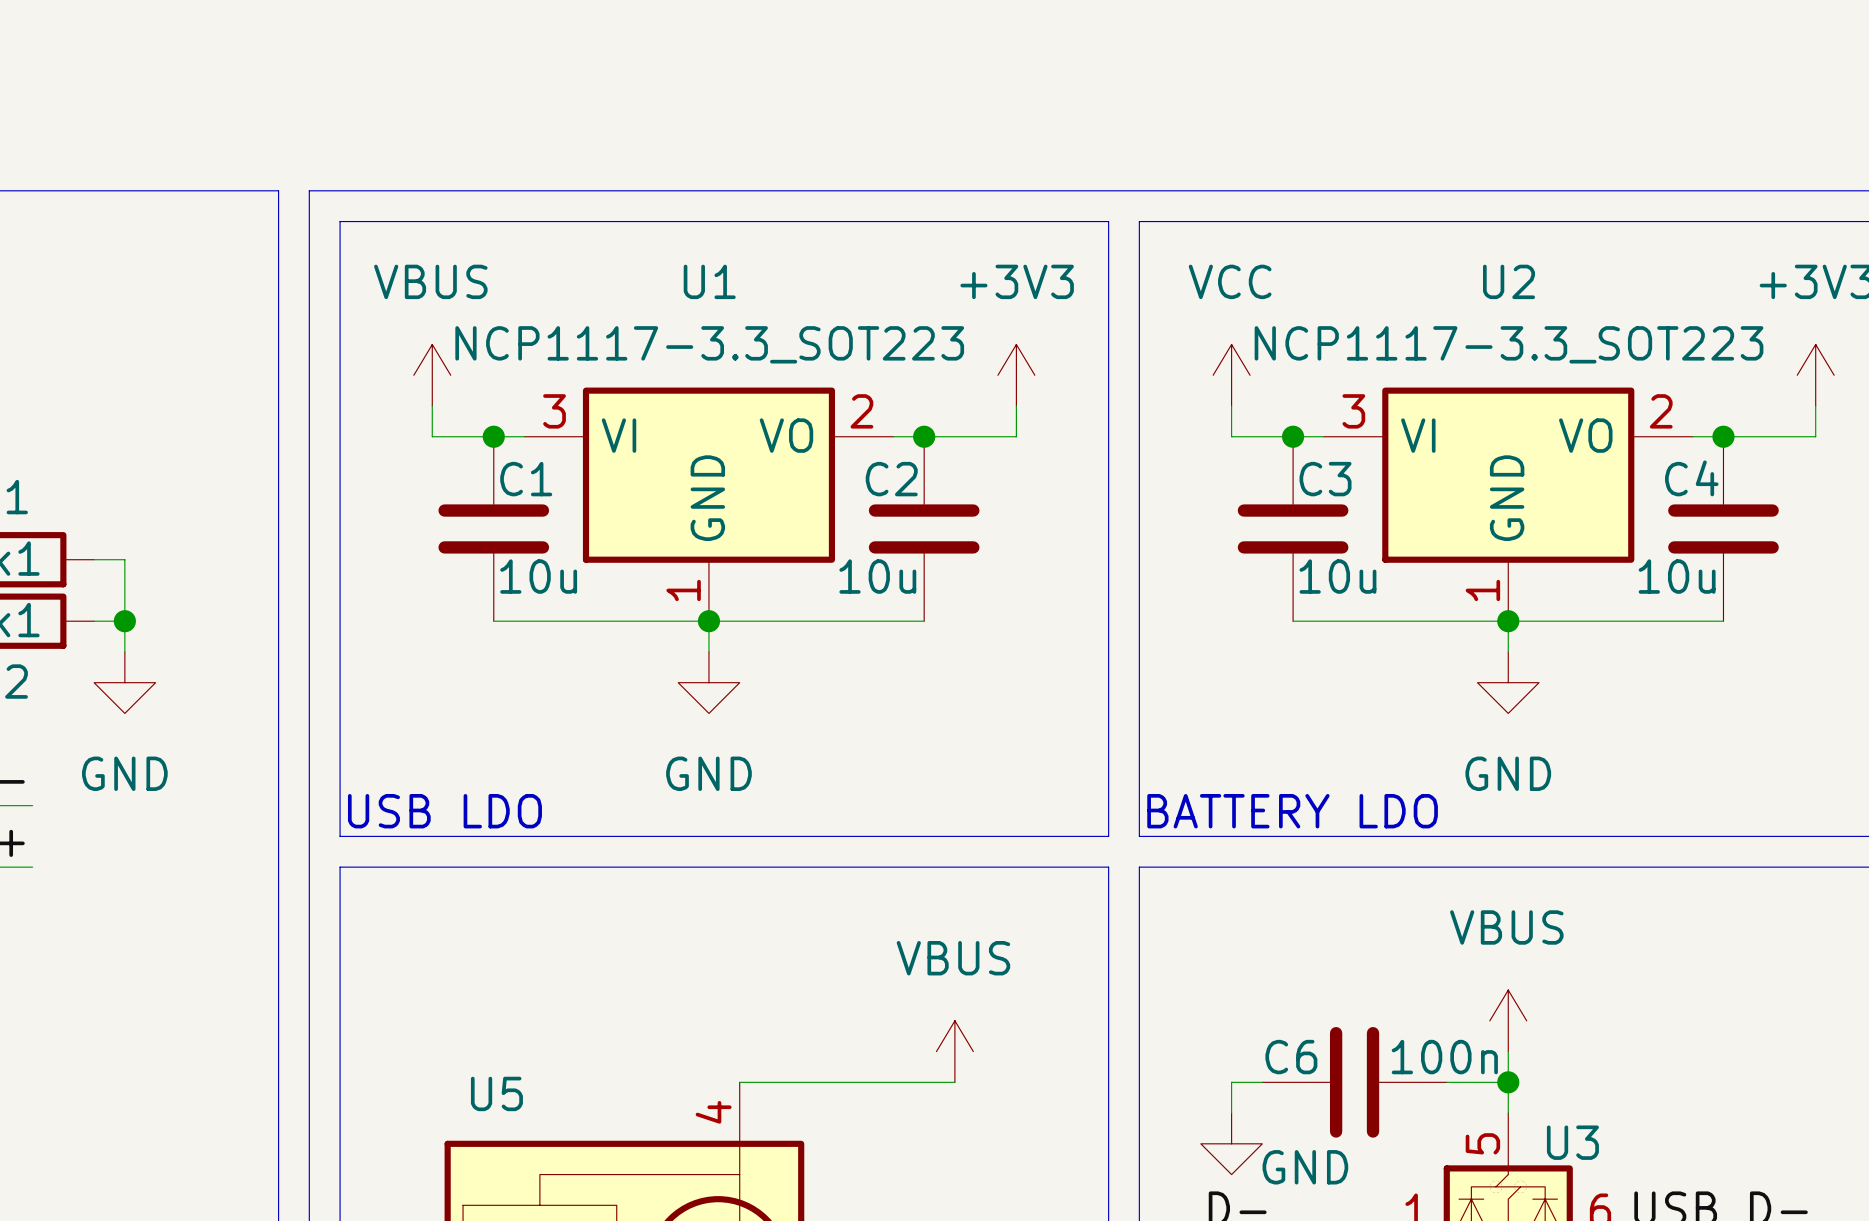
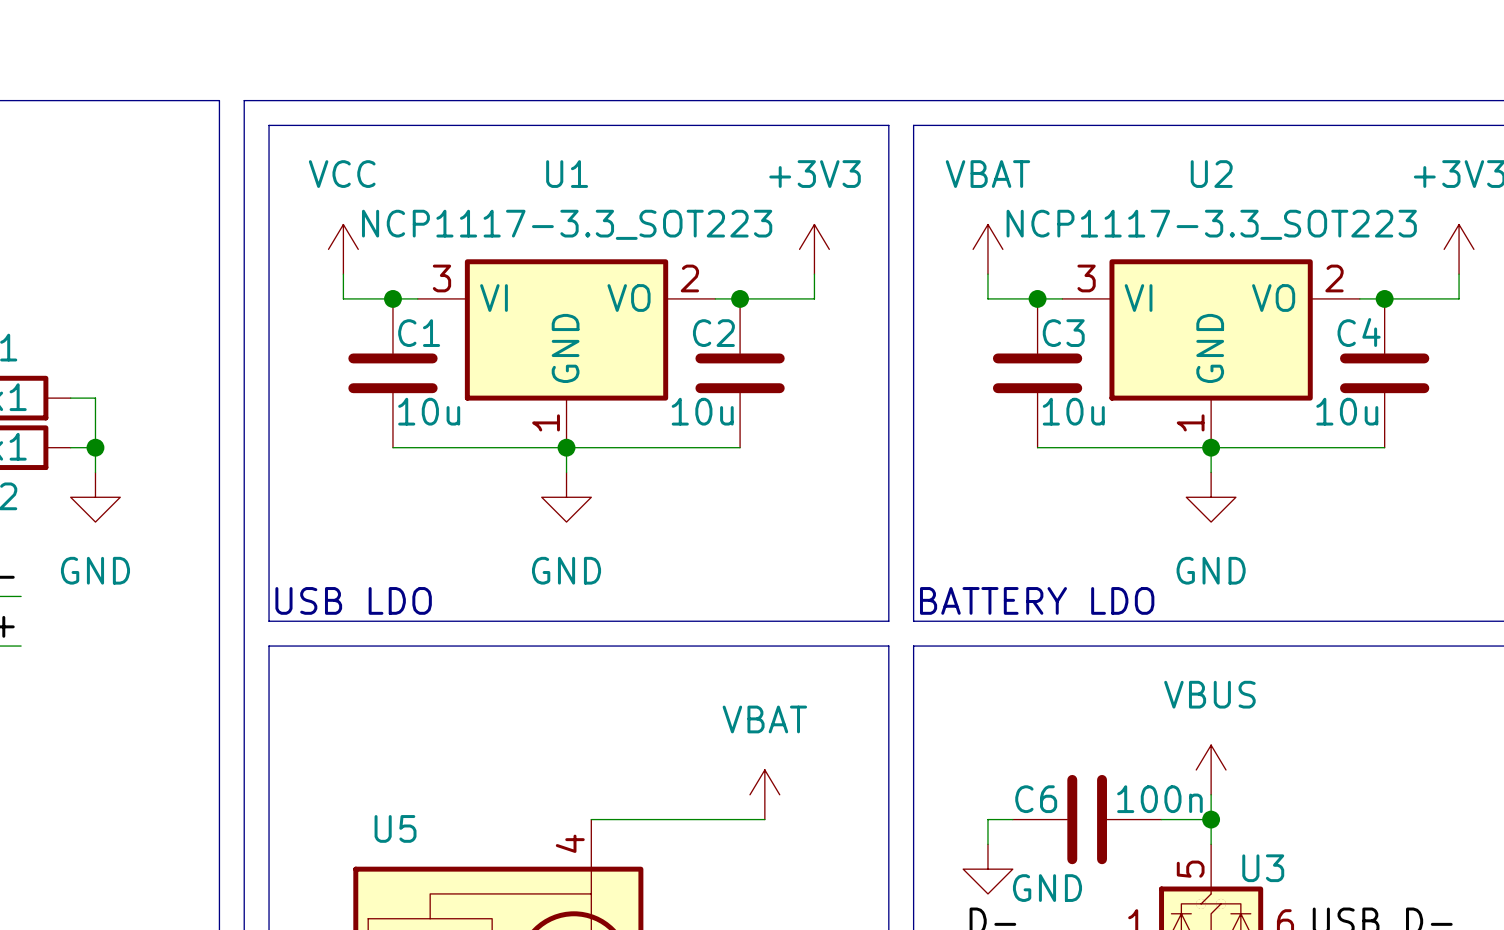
power symbol: VBUS (432, 375) -> VCC (343, 249)
power symbol: VCC (1231, 375) -> VBAT (987, 249)
power symbol: VBUS (954, 1051) -> VBAT (764, 794)

